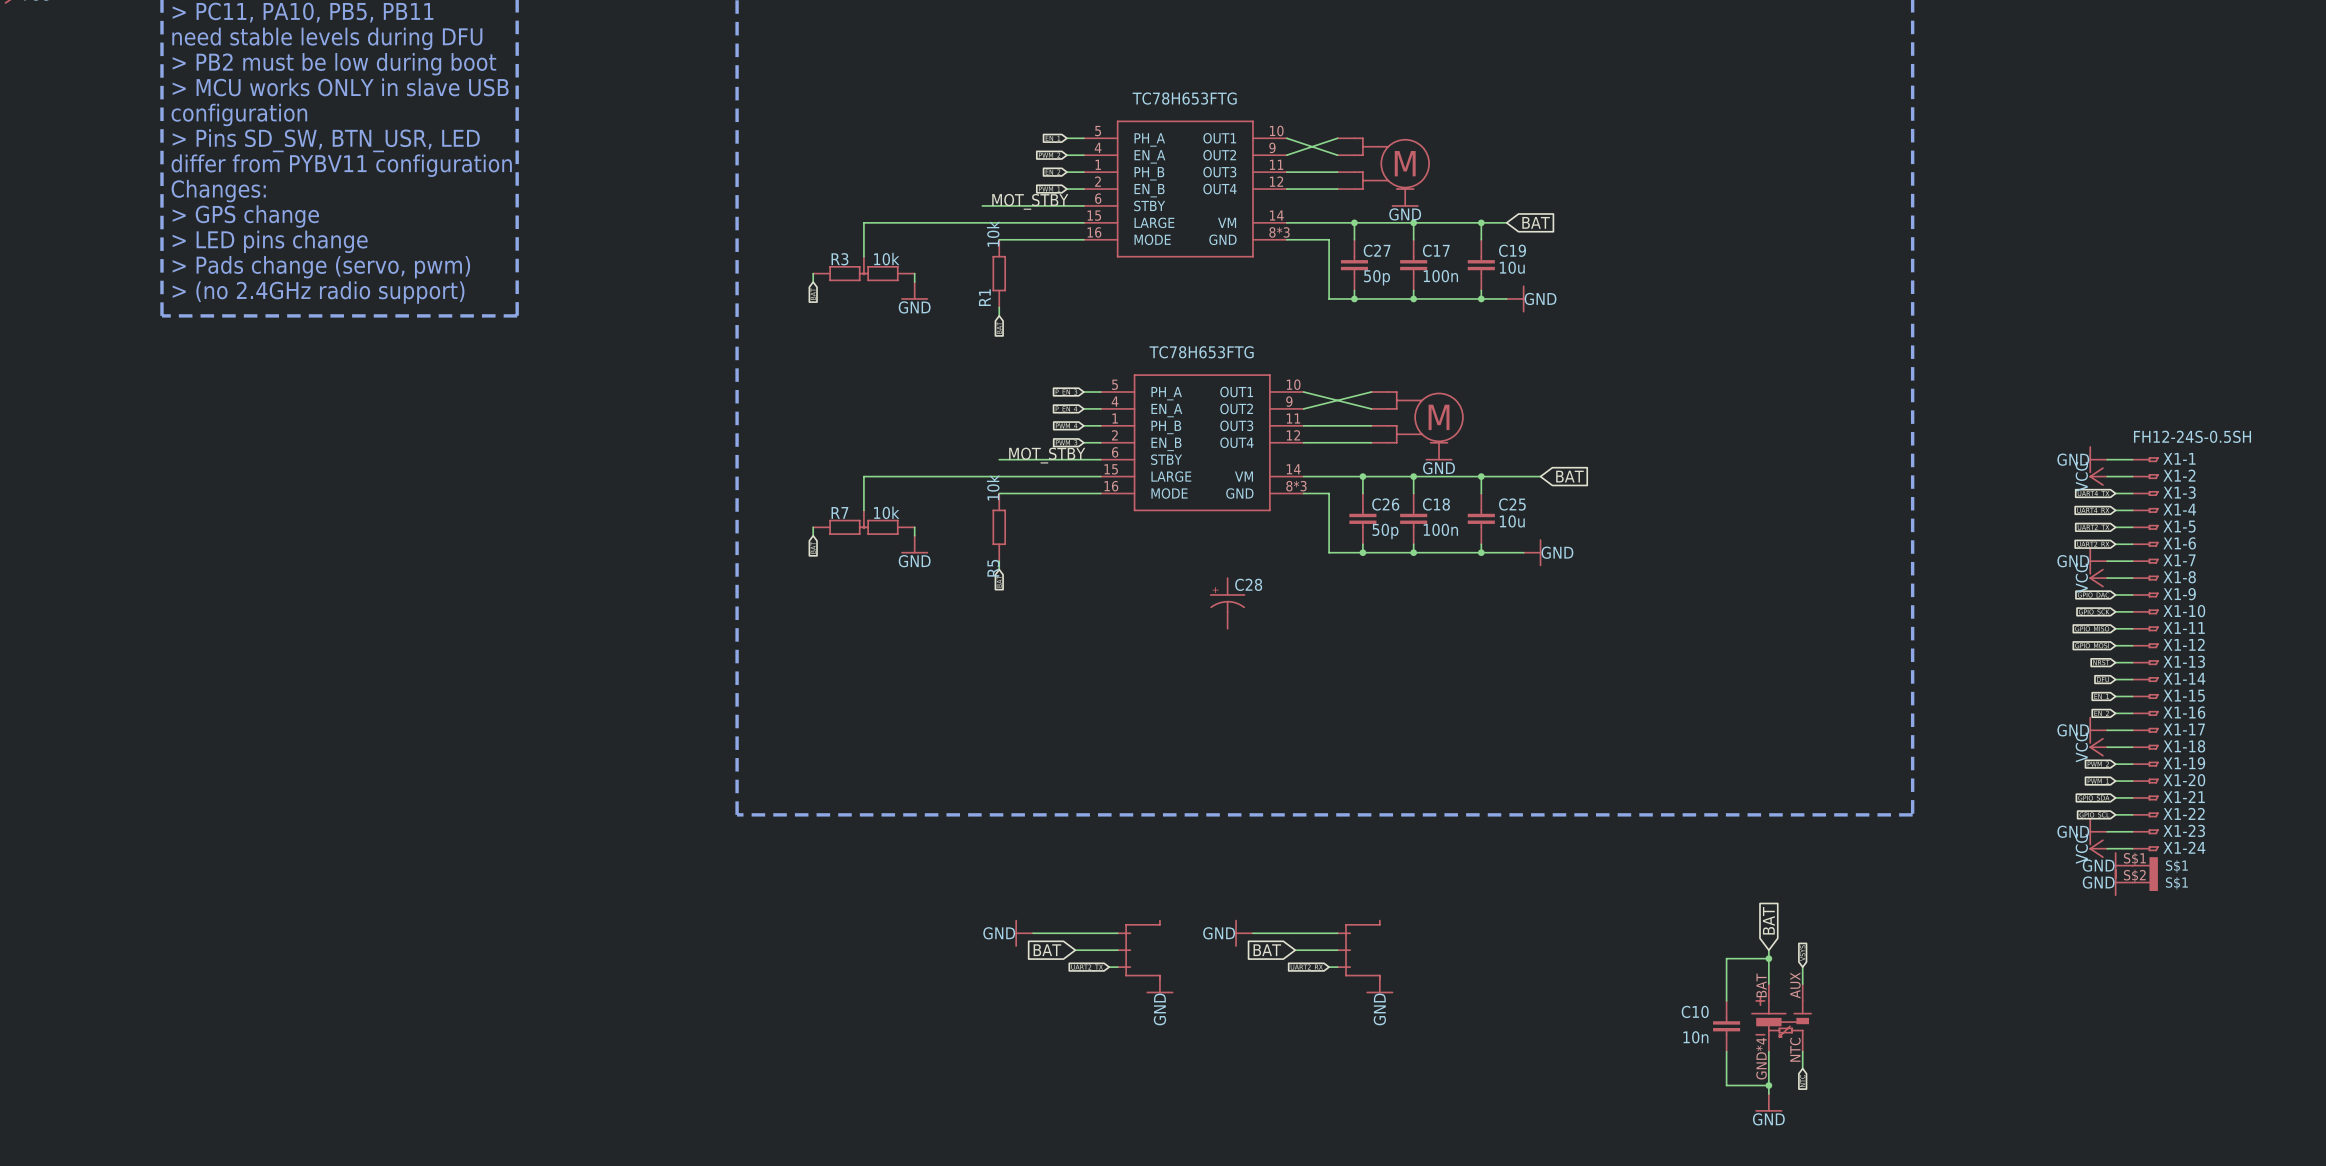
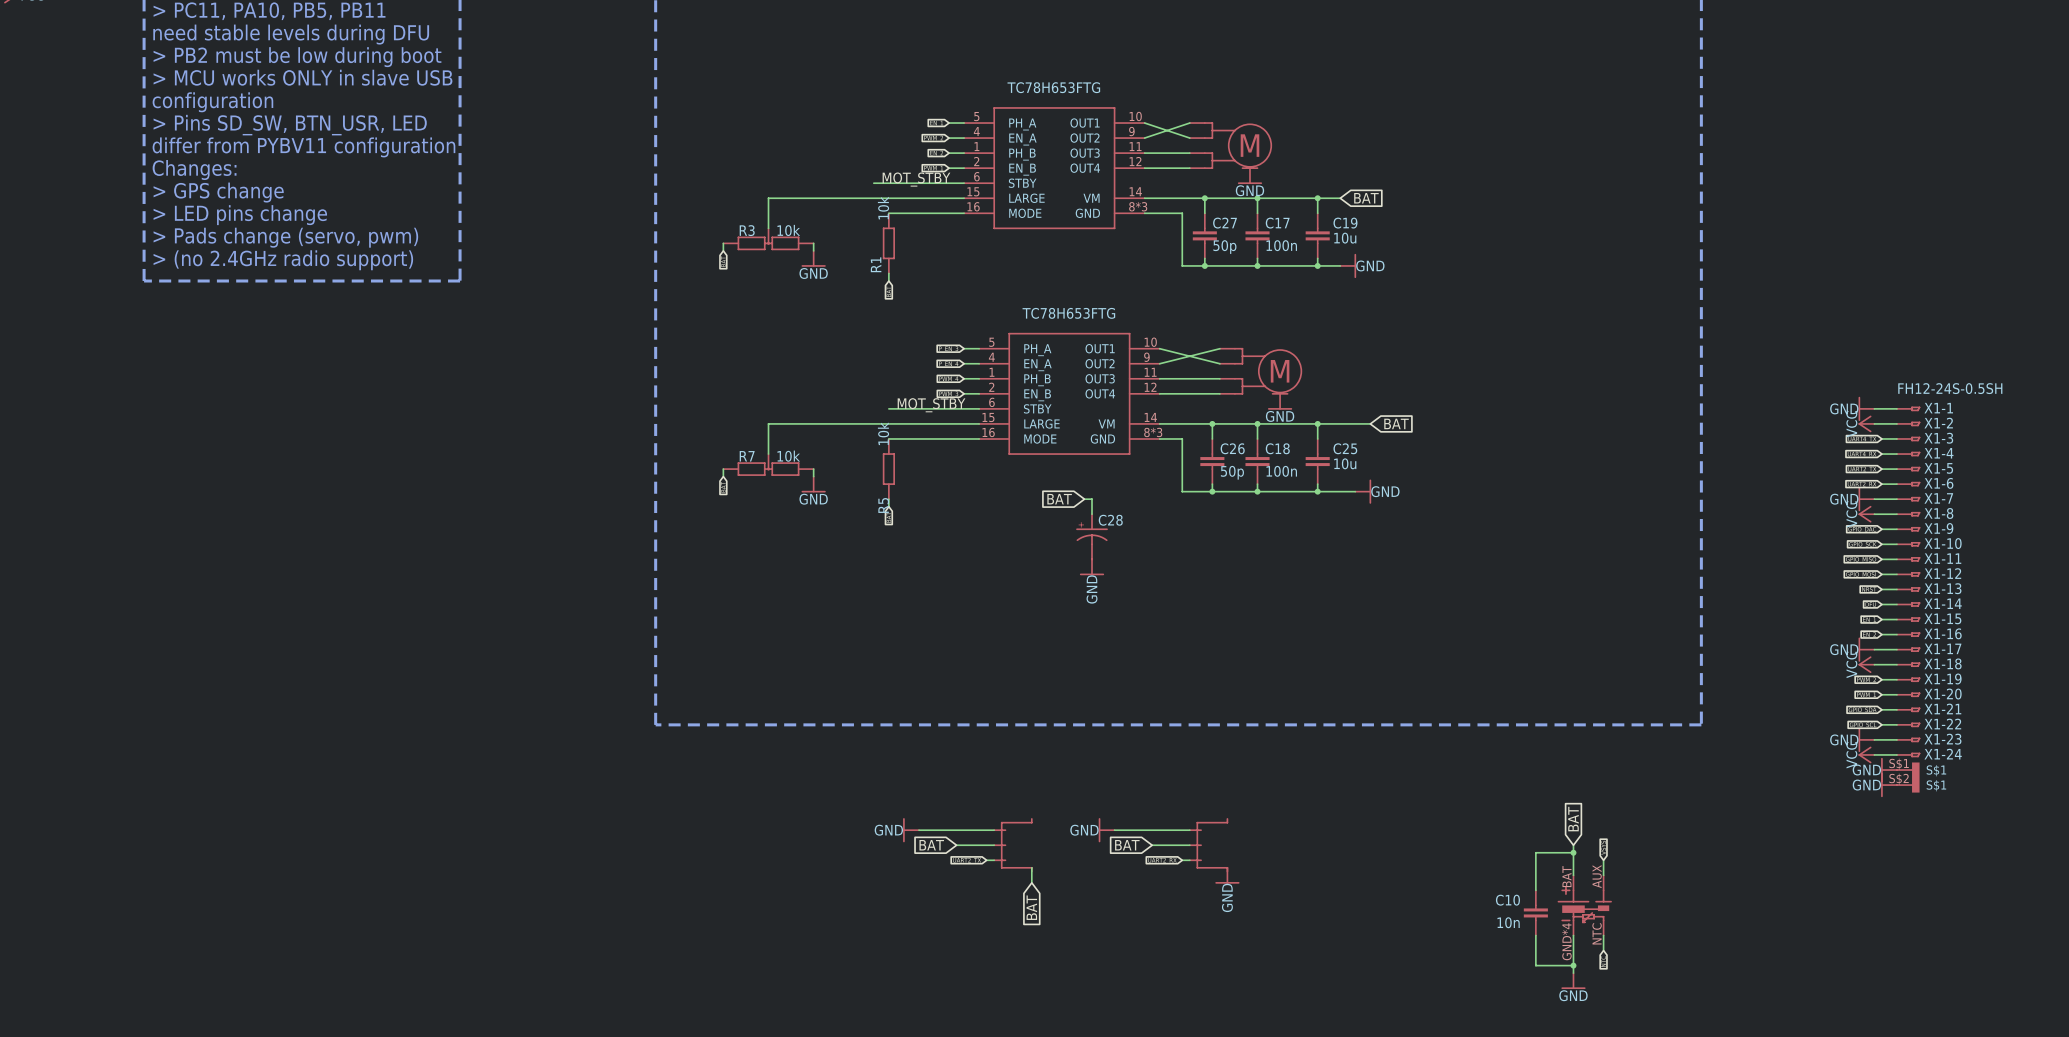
global label: none -> BAT (1059, 499)
wire: none -> (1084, 499) (1092, 499) (1092, 514)
power symbol: none -> GND (1092, 567)
power symbol: GND (1159, 984) -> none
global label: none -> BAT (1031, 907)

